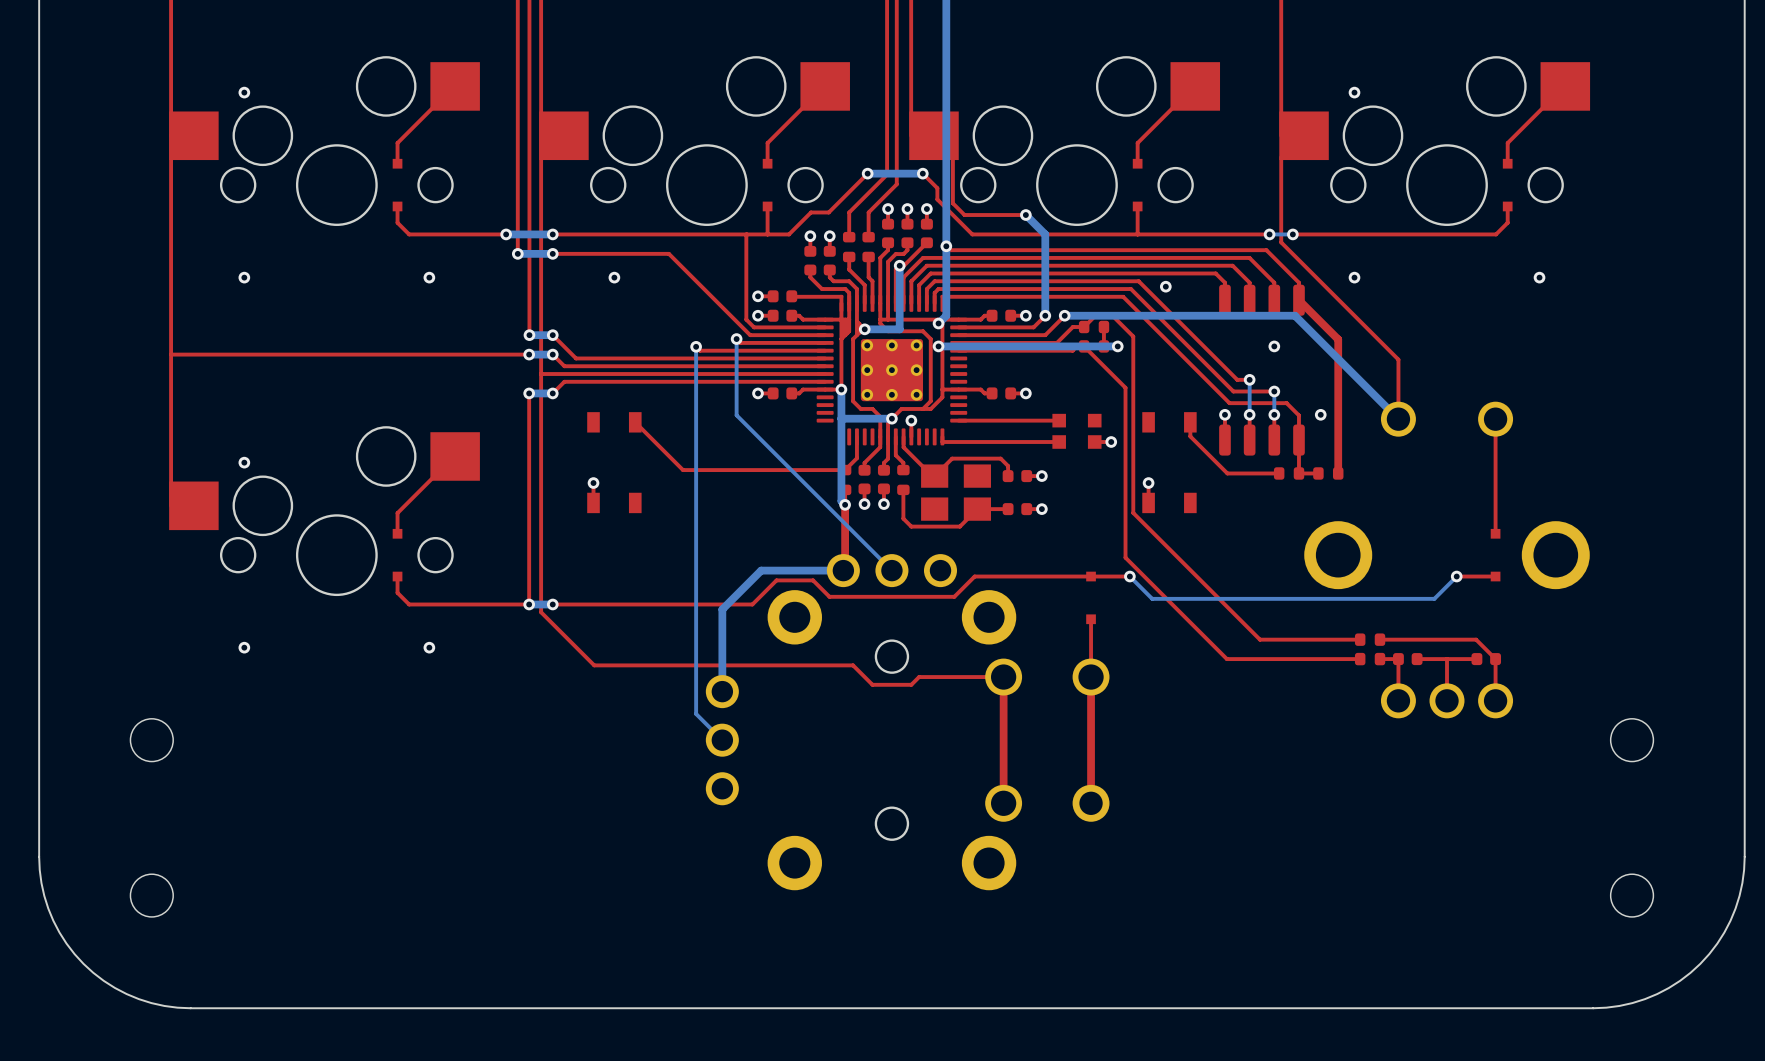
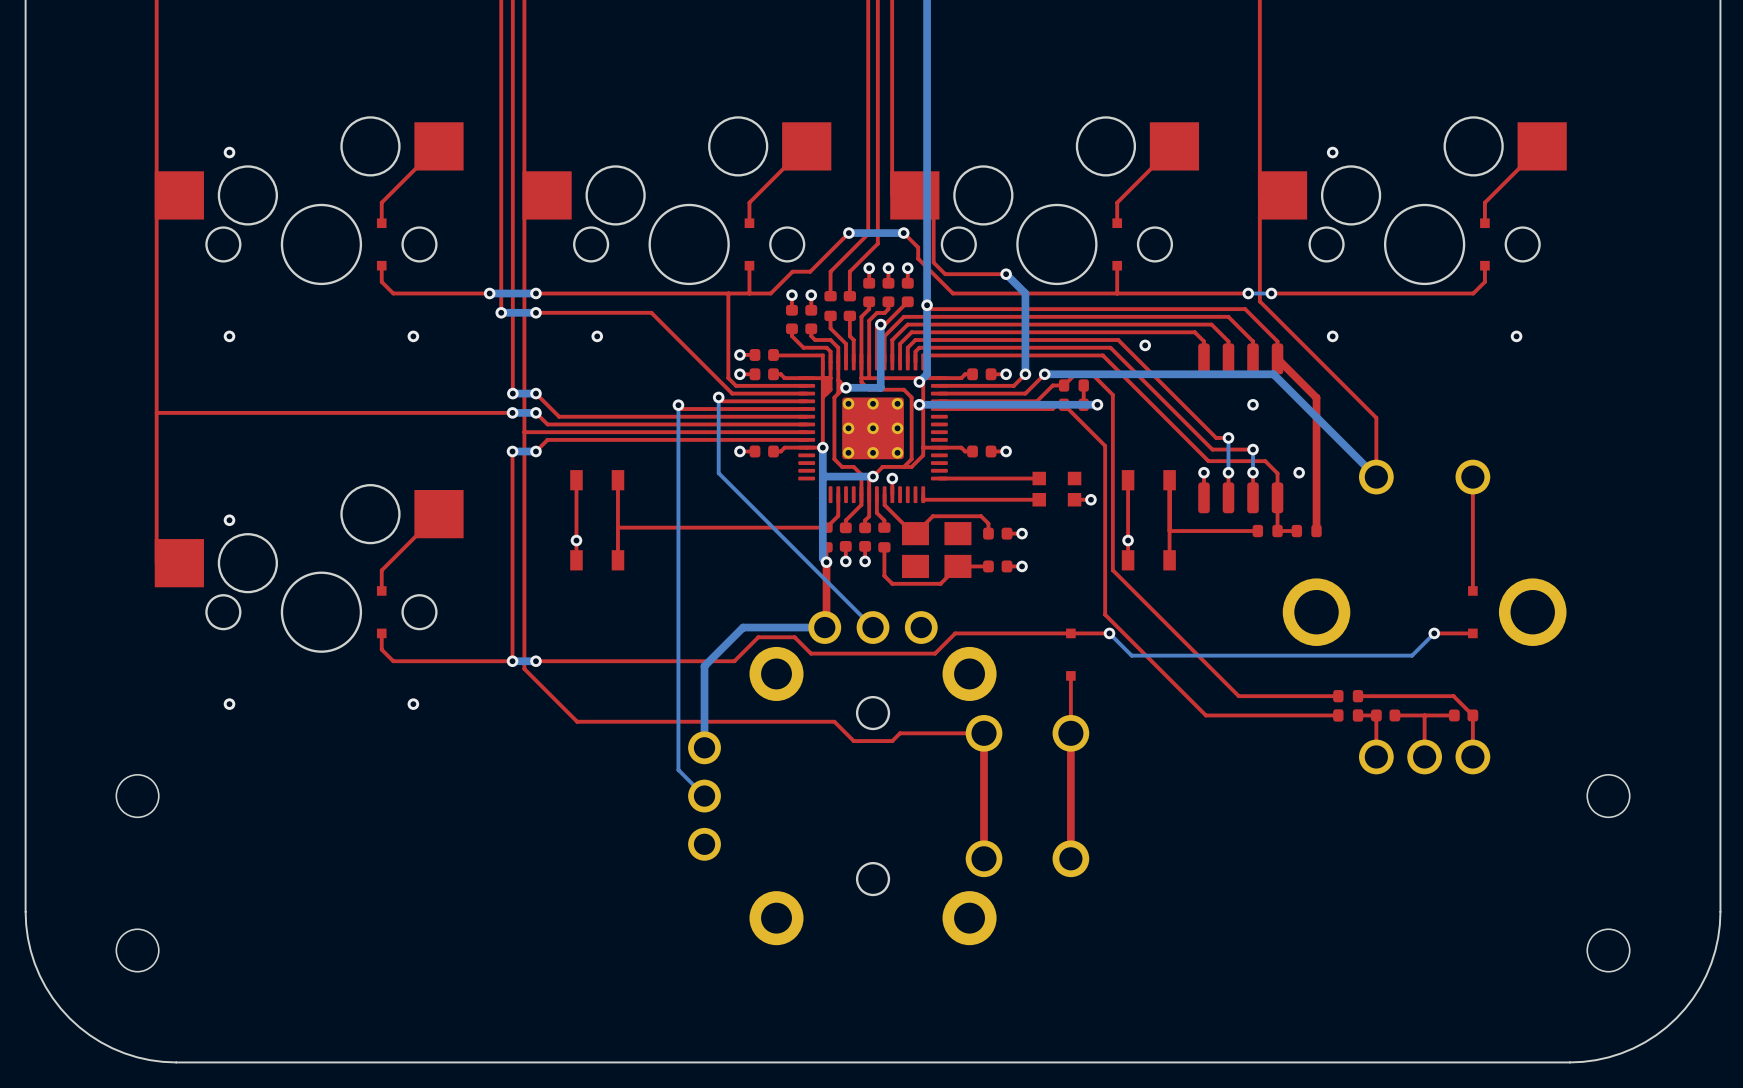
top track: none -> (576, 480) (576, 540)
top track: (635, 422) (683, 470) -> (617, 527) (665, 527)
top track: none -> (617, 480) (617, 560)
top track: none -> (1128, 480) (1128, 540)
top track: (1190, 436) (1227, 473) -> (1169, 531) (1206, 531)
top track: none -> (1169, 494) (1169, 560)

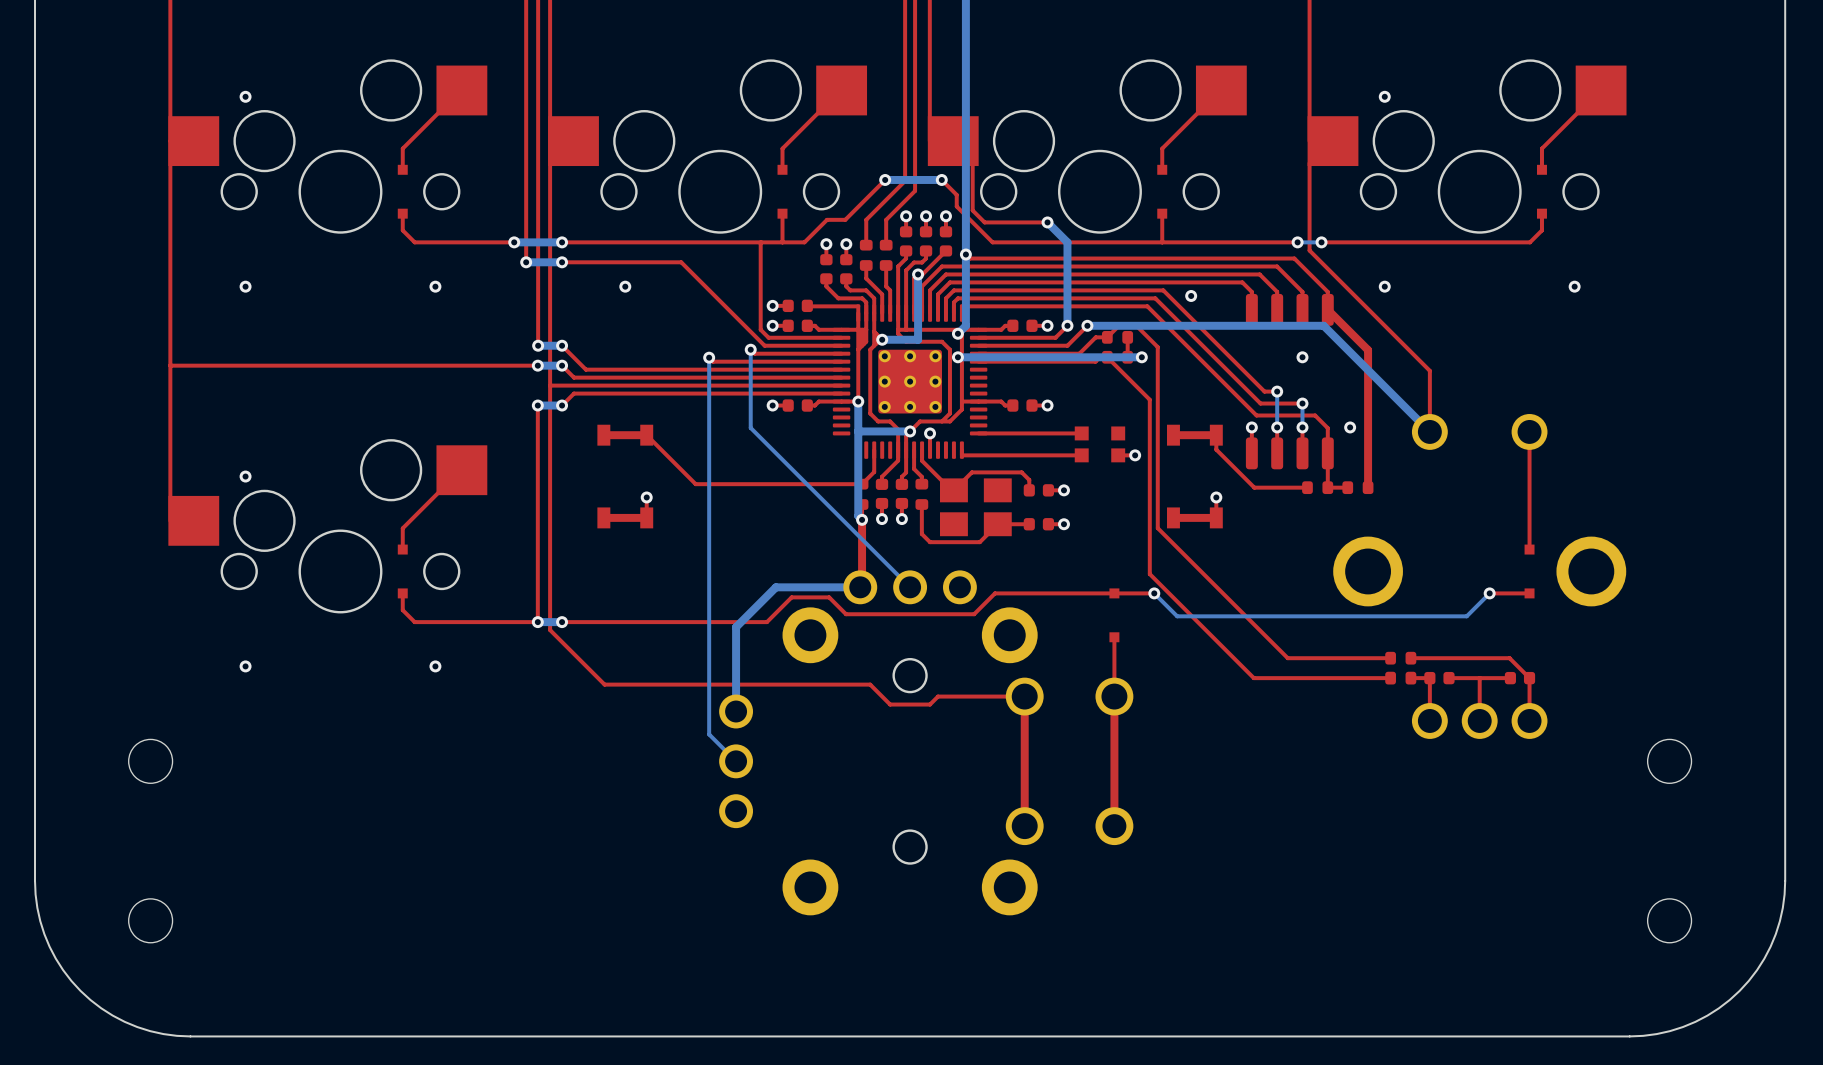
top track: (576, 480) (576, 560) -> (646, 517) (603, 517)
top track: (617, 480) (617, 540) -> none
top track: (1128, 480) (1128, 560) -> (1173, 435) (1216, 435)
top track: (1169, 494) (1169, 540) -> none
top track: (665, 527) (617, 527) -> (695, 484) (646, 435) (603, 435)
top track: (1206, 531) (1169, 531) -> (1254, 487) (1216, 449)
via position: (576, 540) -> (646, 497)
via position: (1128, 540) -> (1216, 497)
top track: none -> (1216, 517) (1173, 517)

